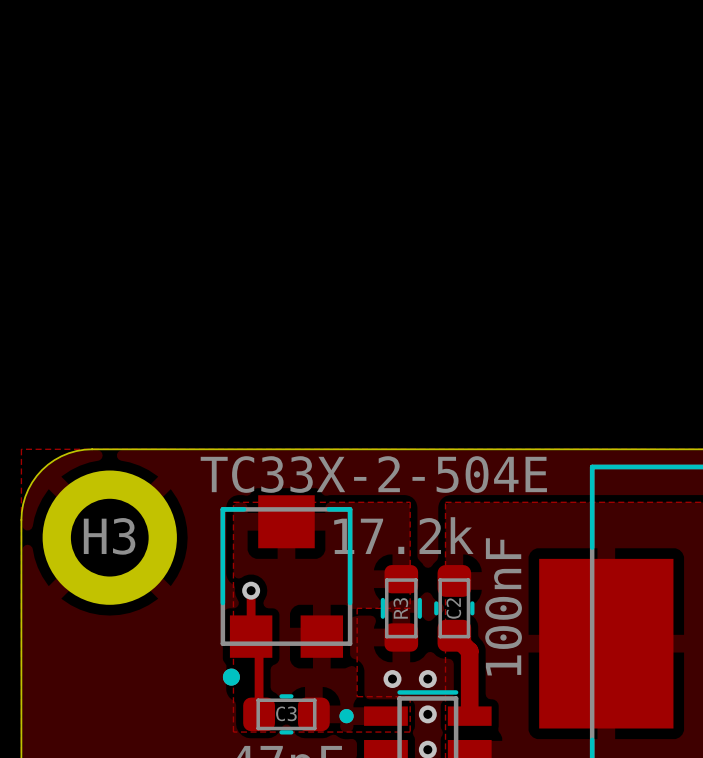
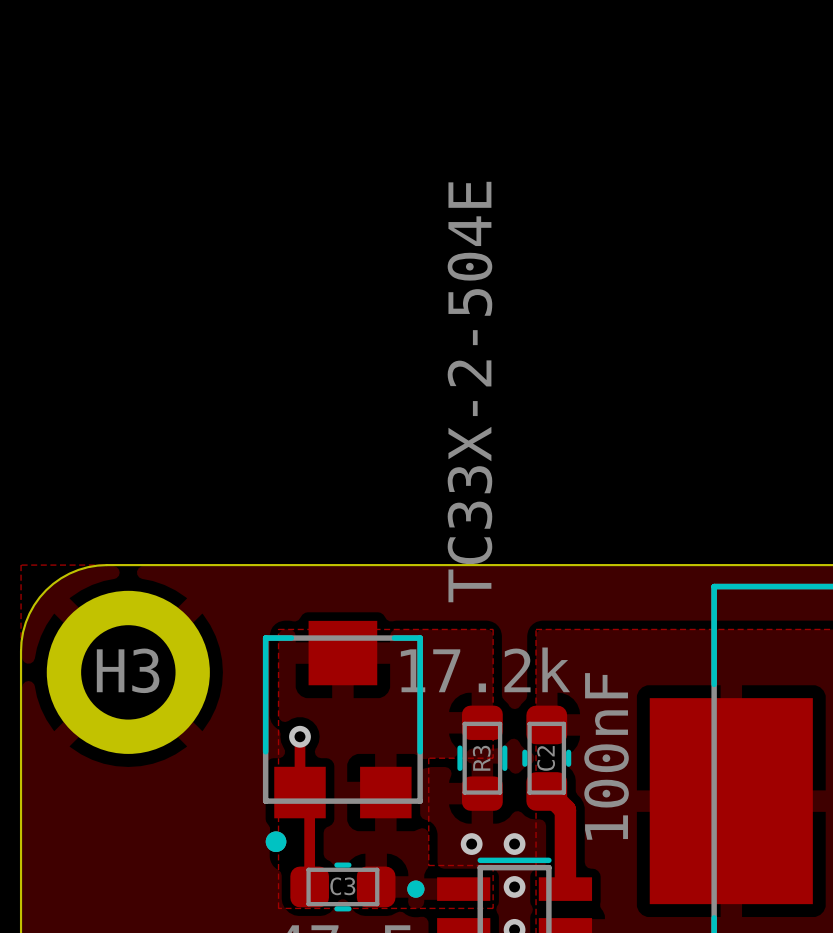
part value rotation: 0° (373, 474) -> 90° counterclockwise (469, 392)

